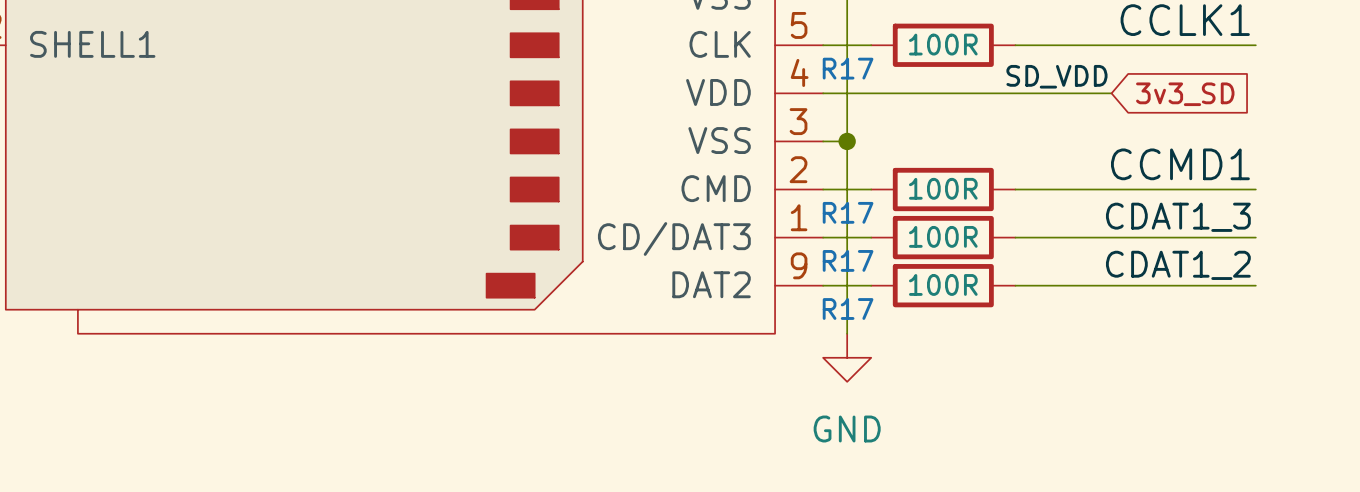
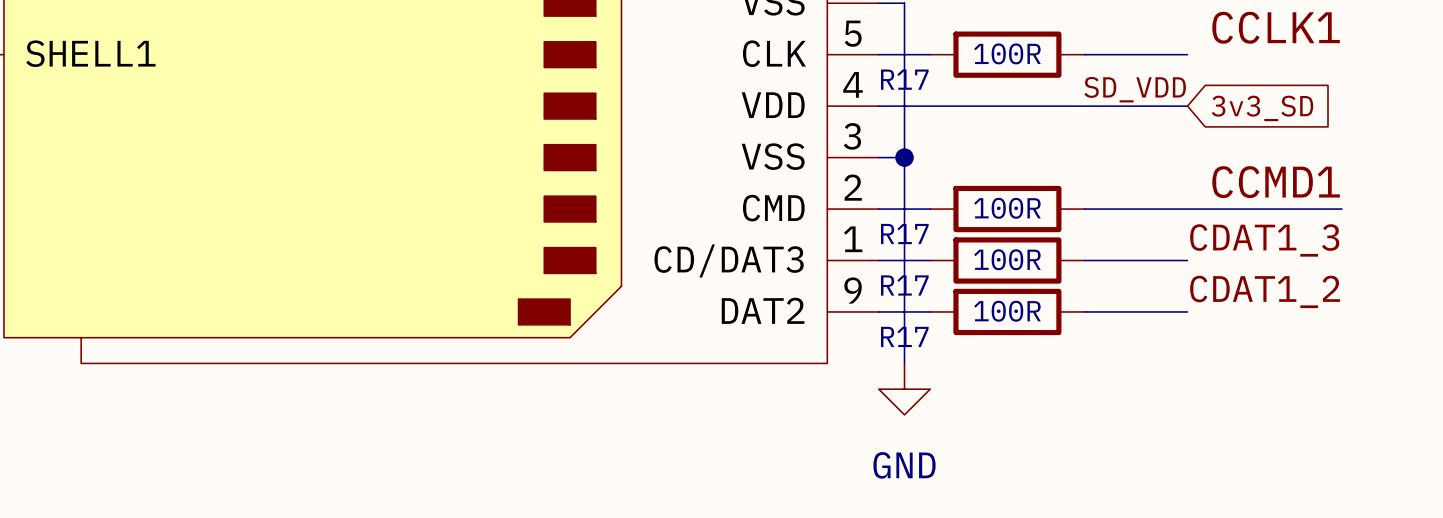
wire: (1111, 45) (1255, 45) -> none
label position: CDAT1_3 (1178, 217) -> CDAT1_3 (1264, 240)
wire: (1111, 237) (1255, 237) -> none
label position: CDAT1_2 (1178, 265) -> CDAT1_2 (1265, 291)
wire: (1111, 285) (1255, 285) -> none

